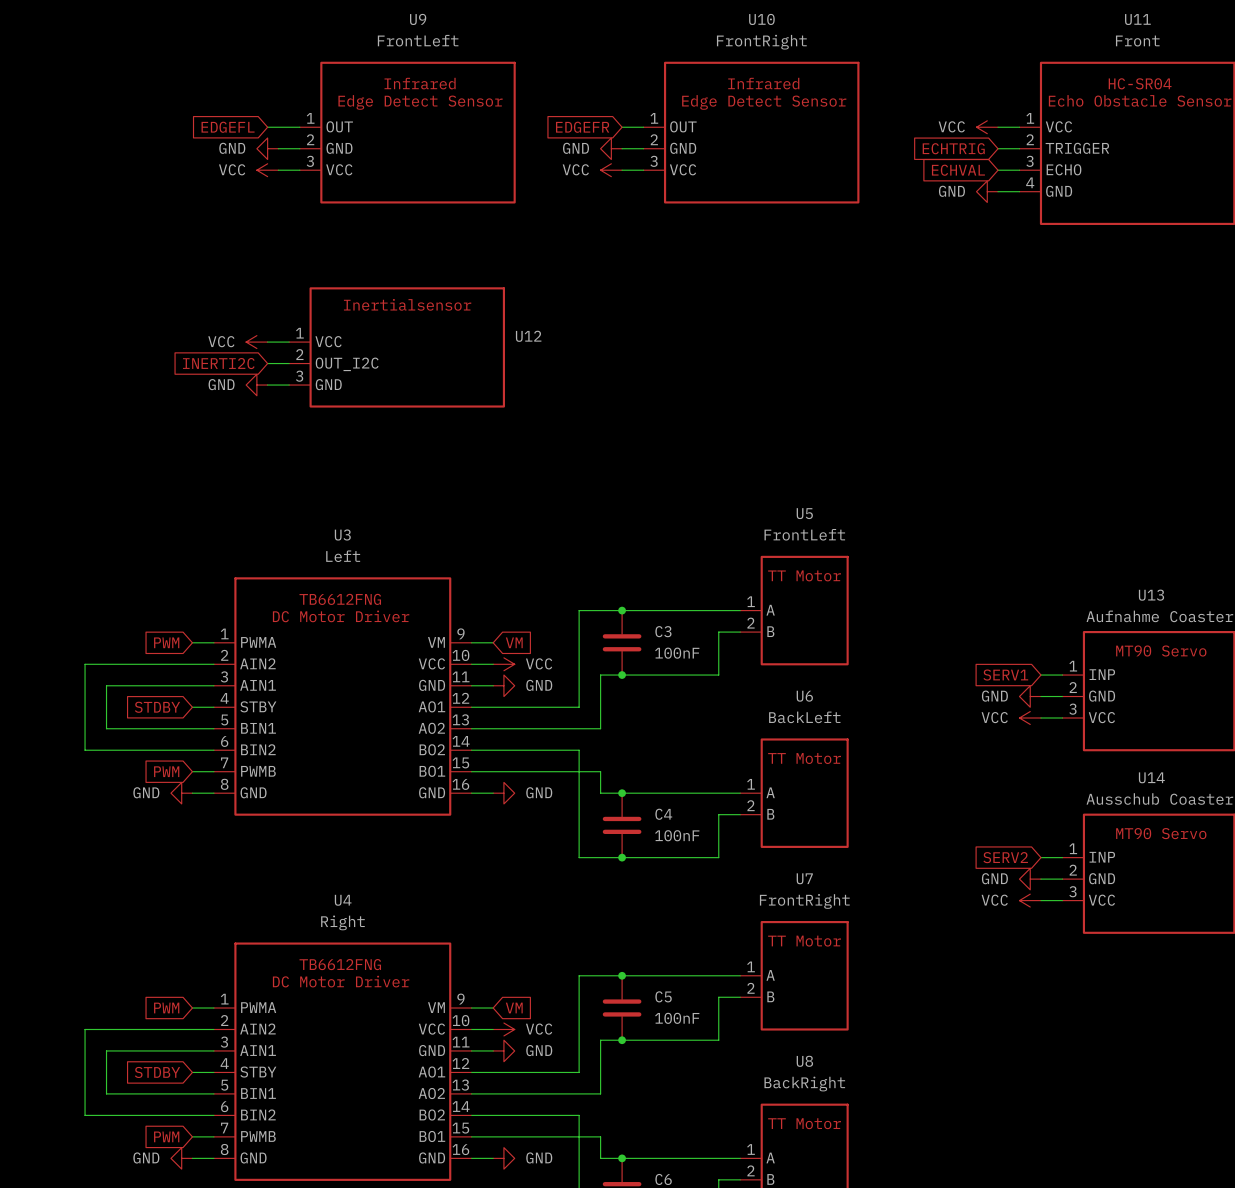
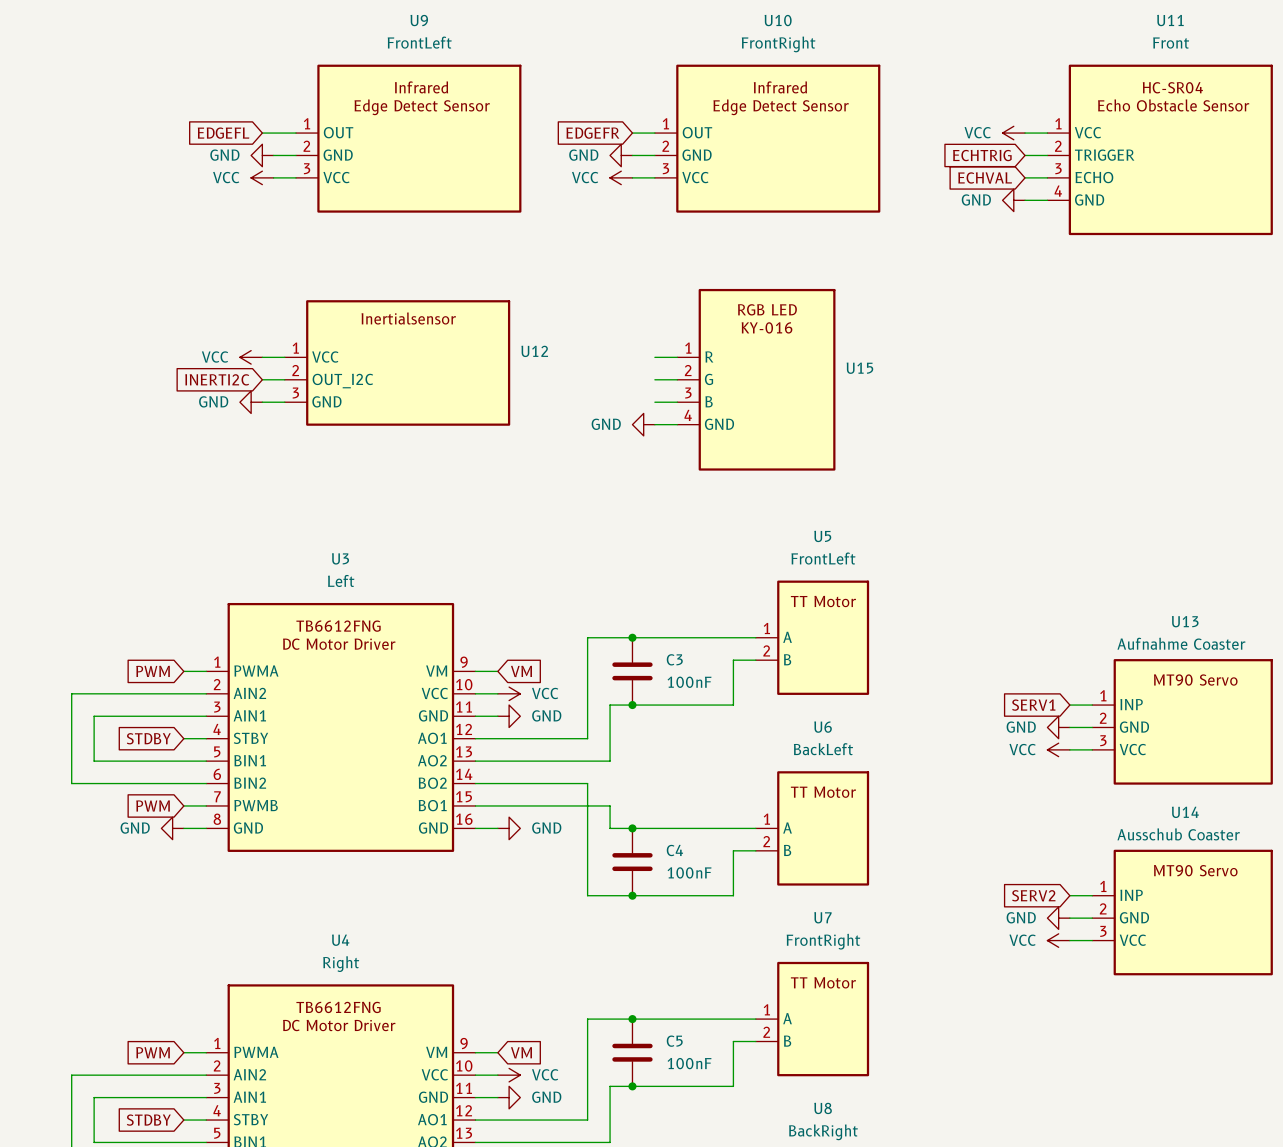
wire: none -> (654, 357) (677, 357)
wire: none -> (654, 379) (677, 379)
U15: none -> (756, 379)
wire: none -> (654, 402) (677, 402)
power symbol: none -> GND (643, 424)
wire: none -> (654, 424) (677, 424)

